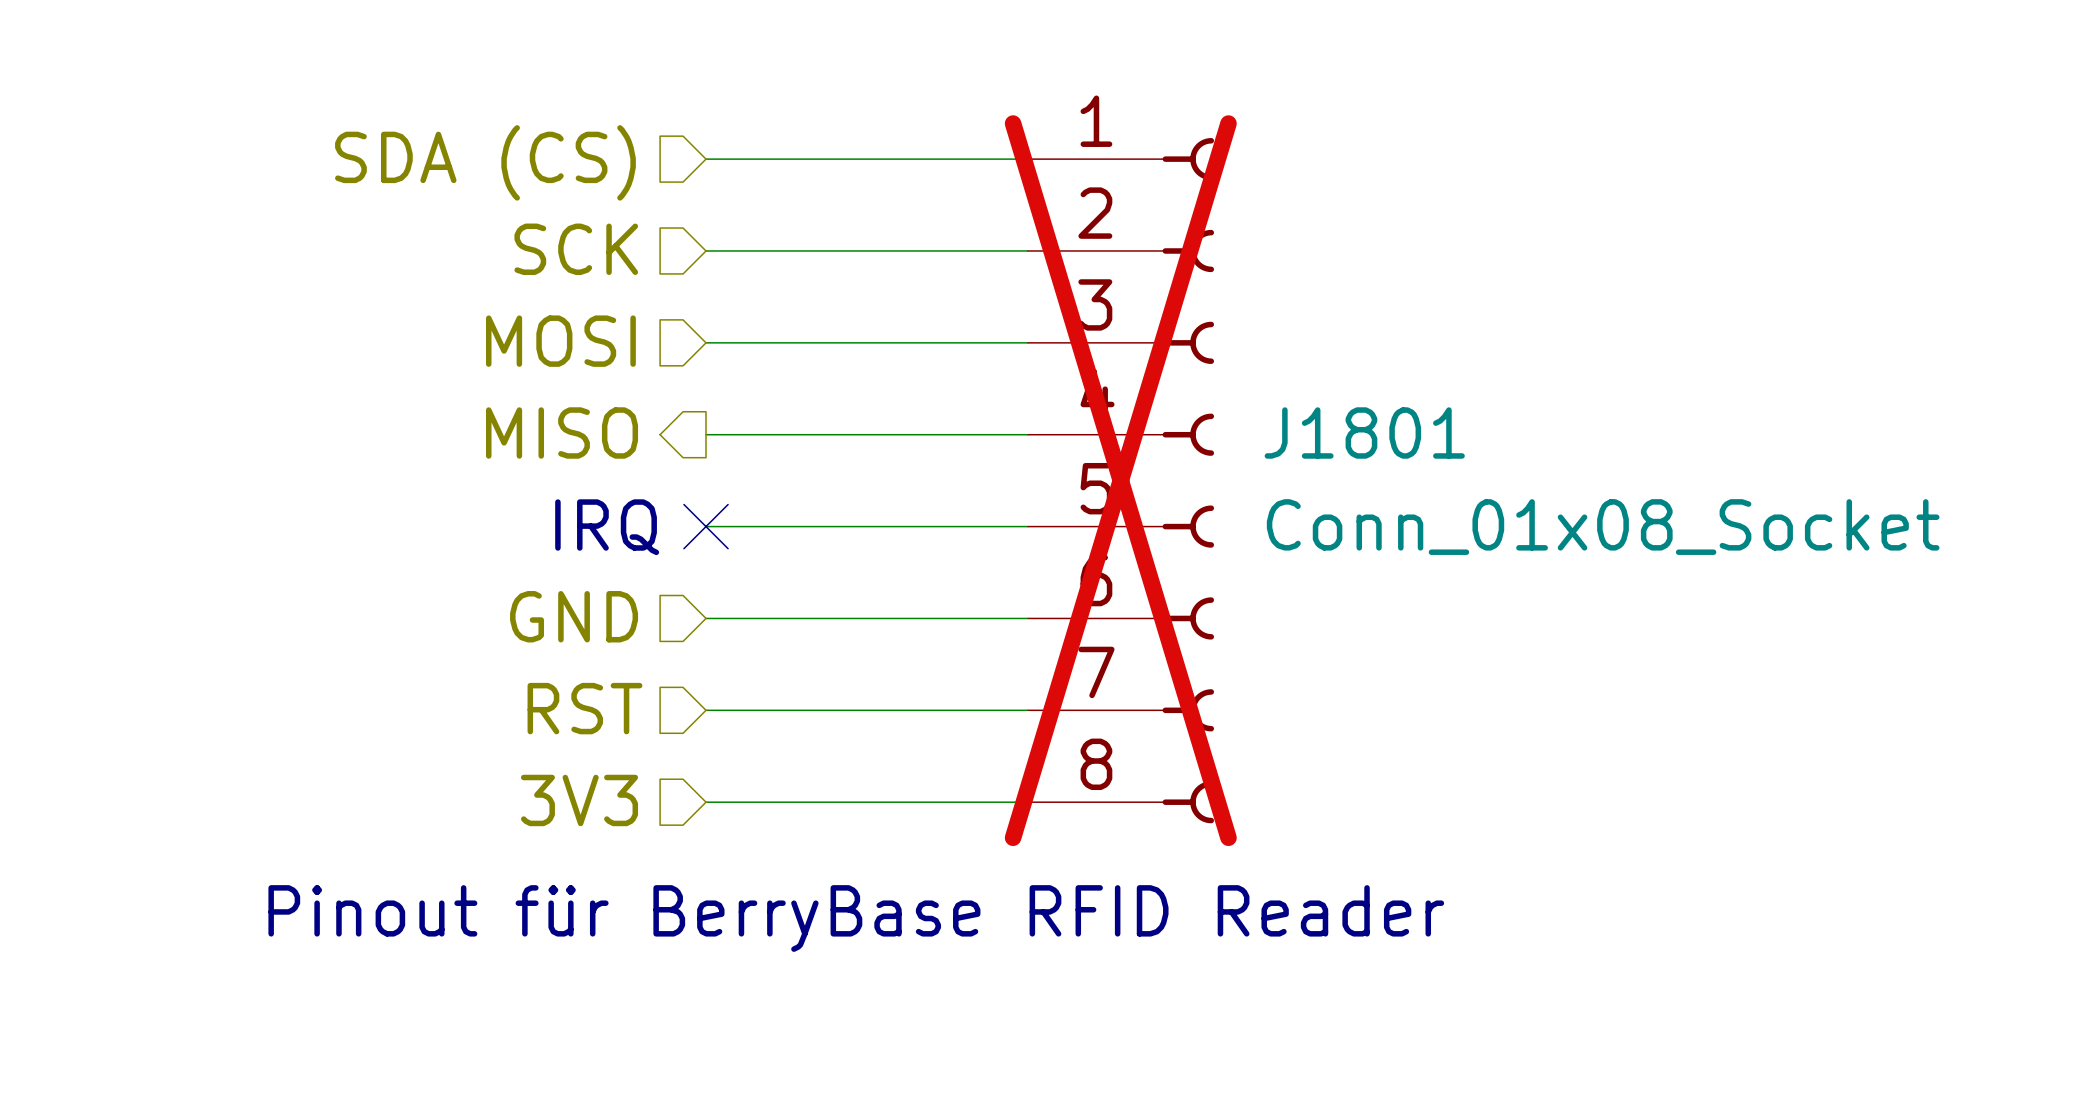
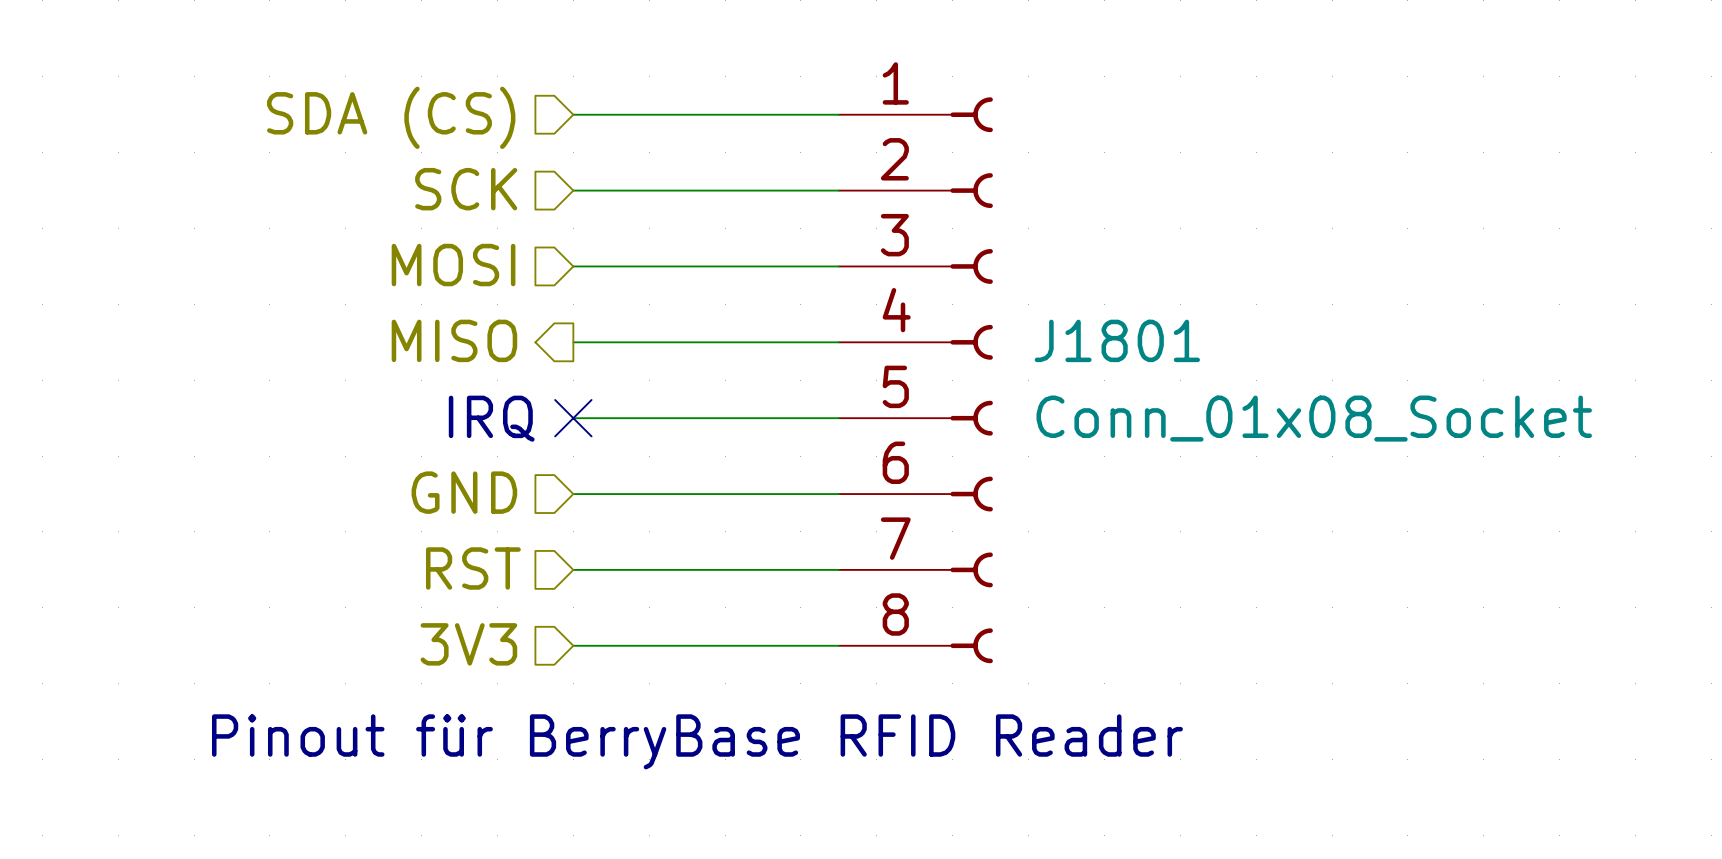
J1801 do-not-place cross: (1120, 480) -> none

